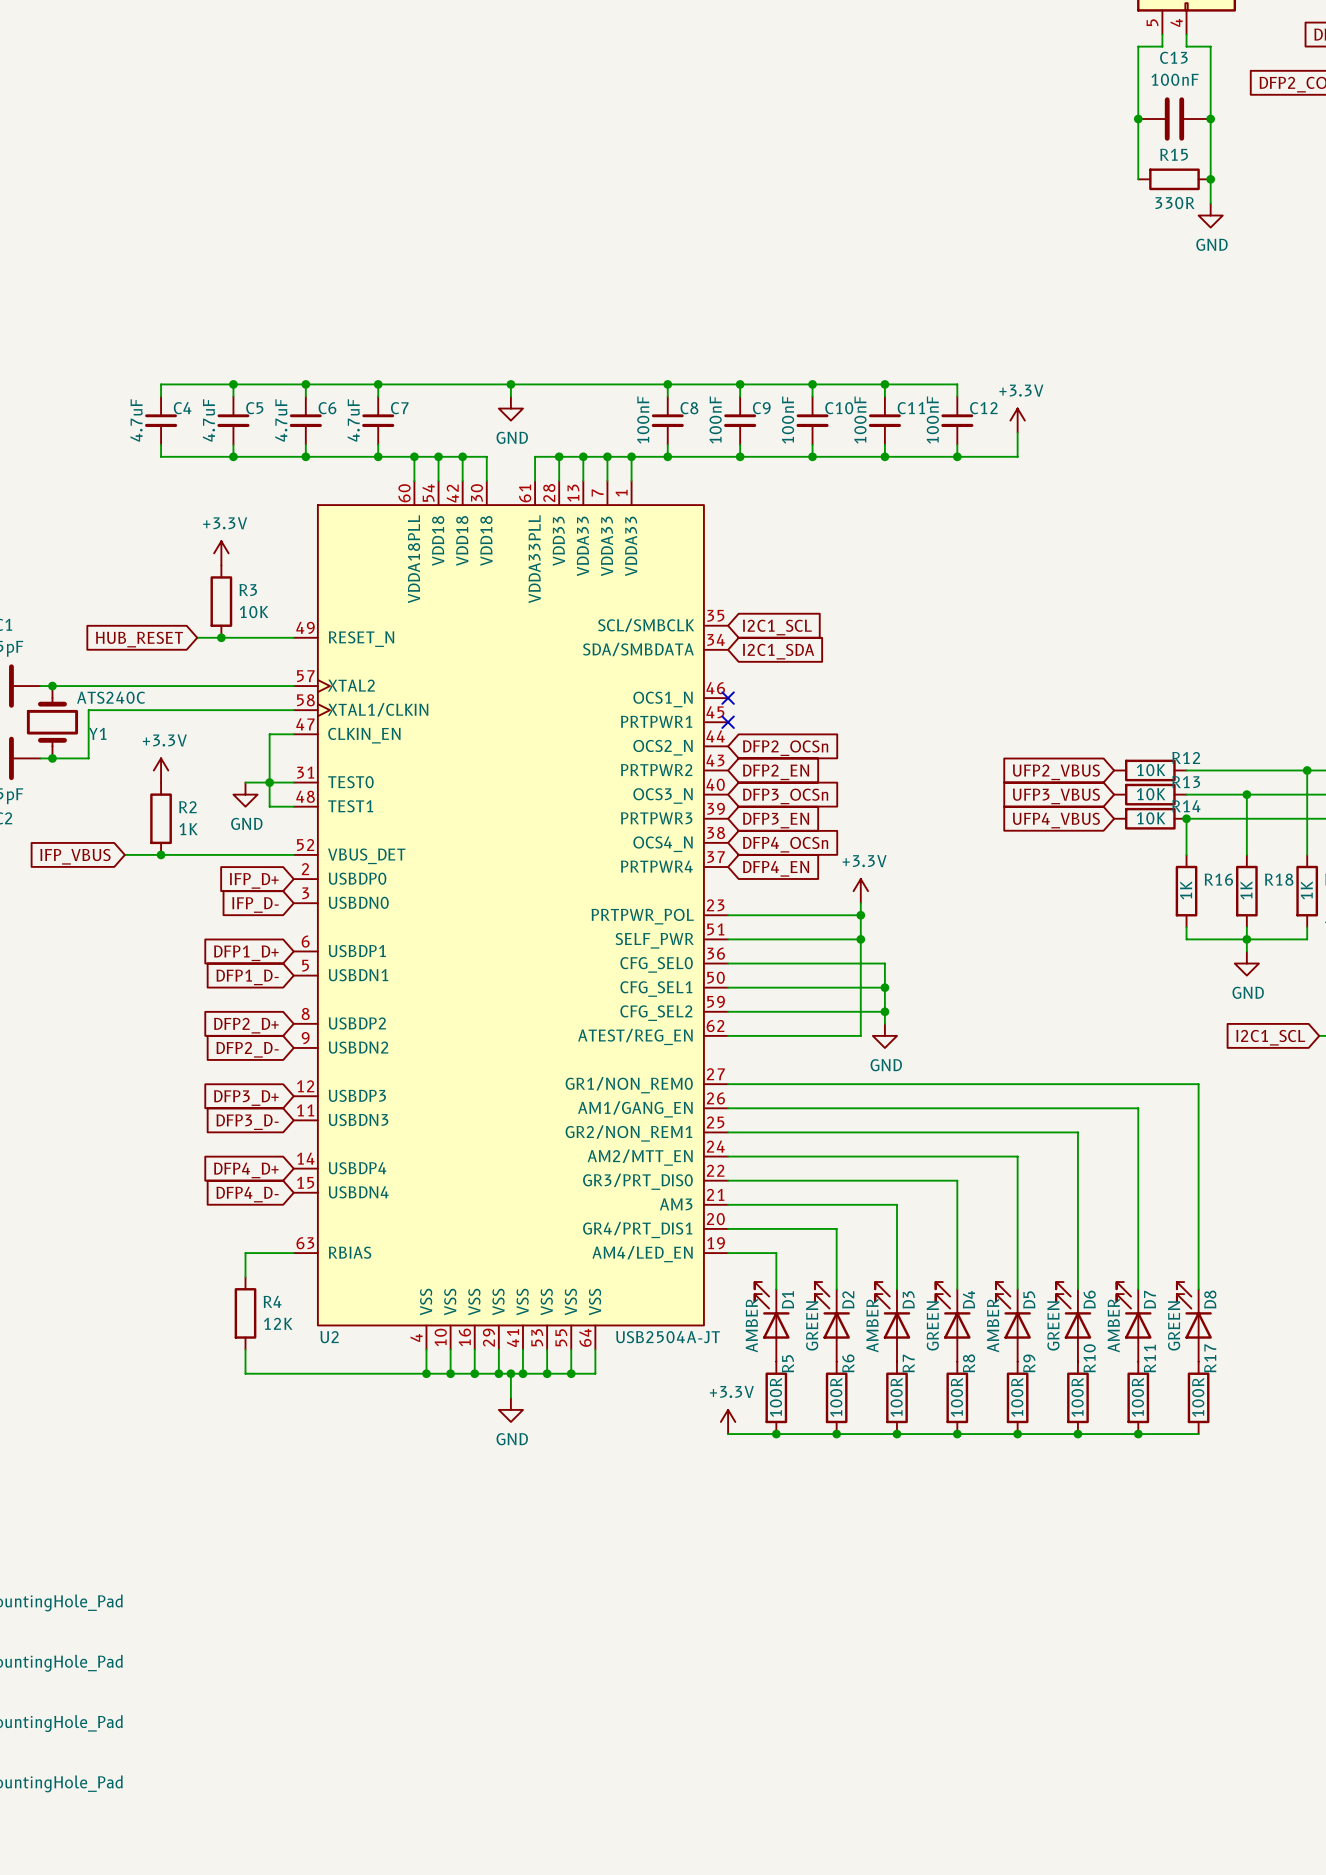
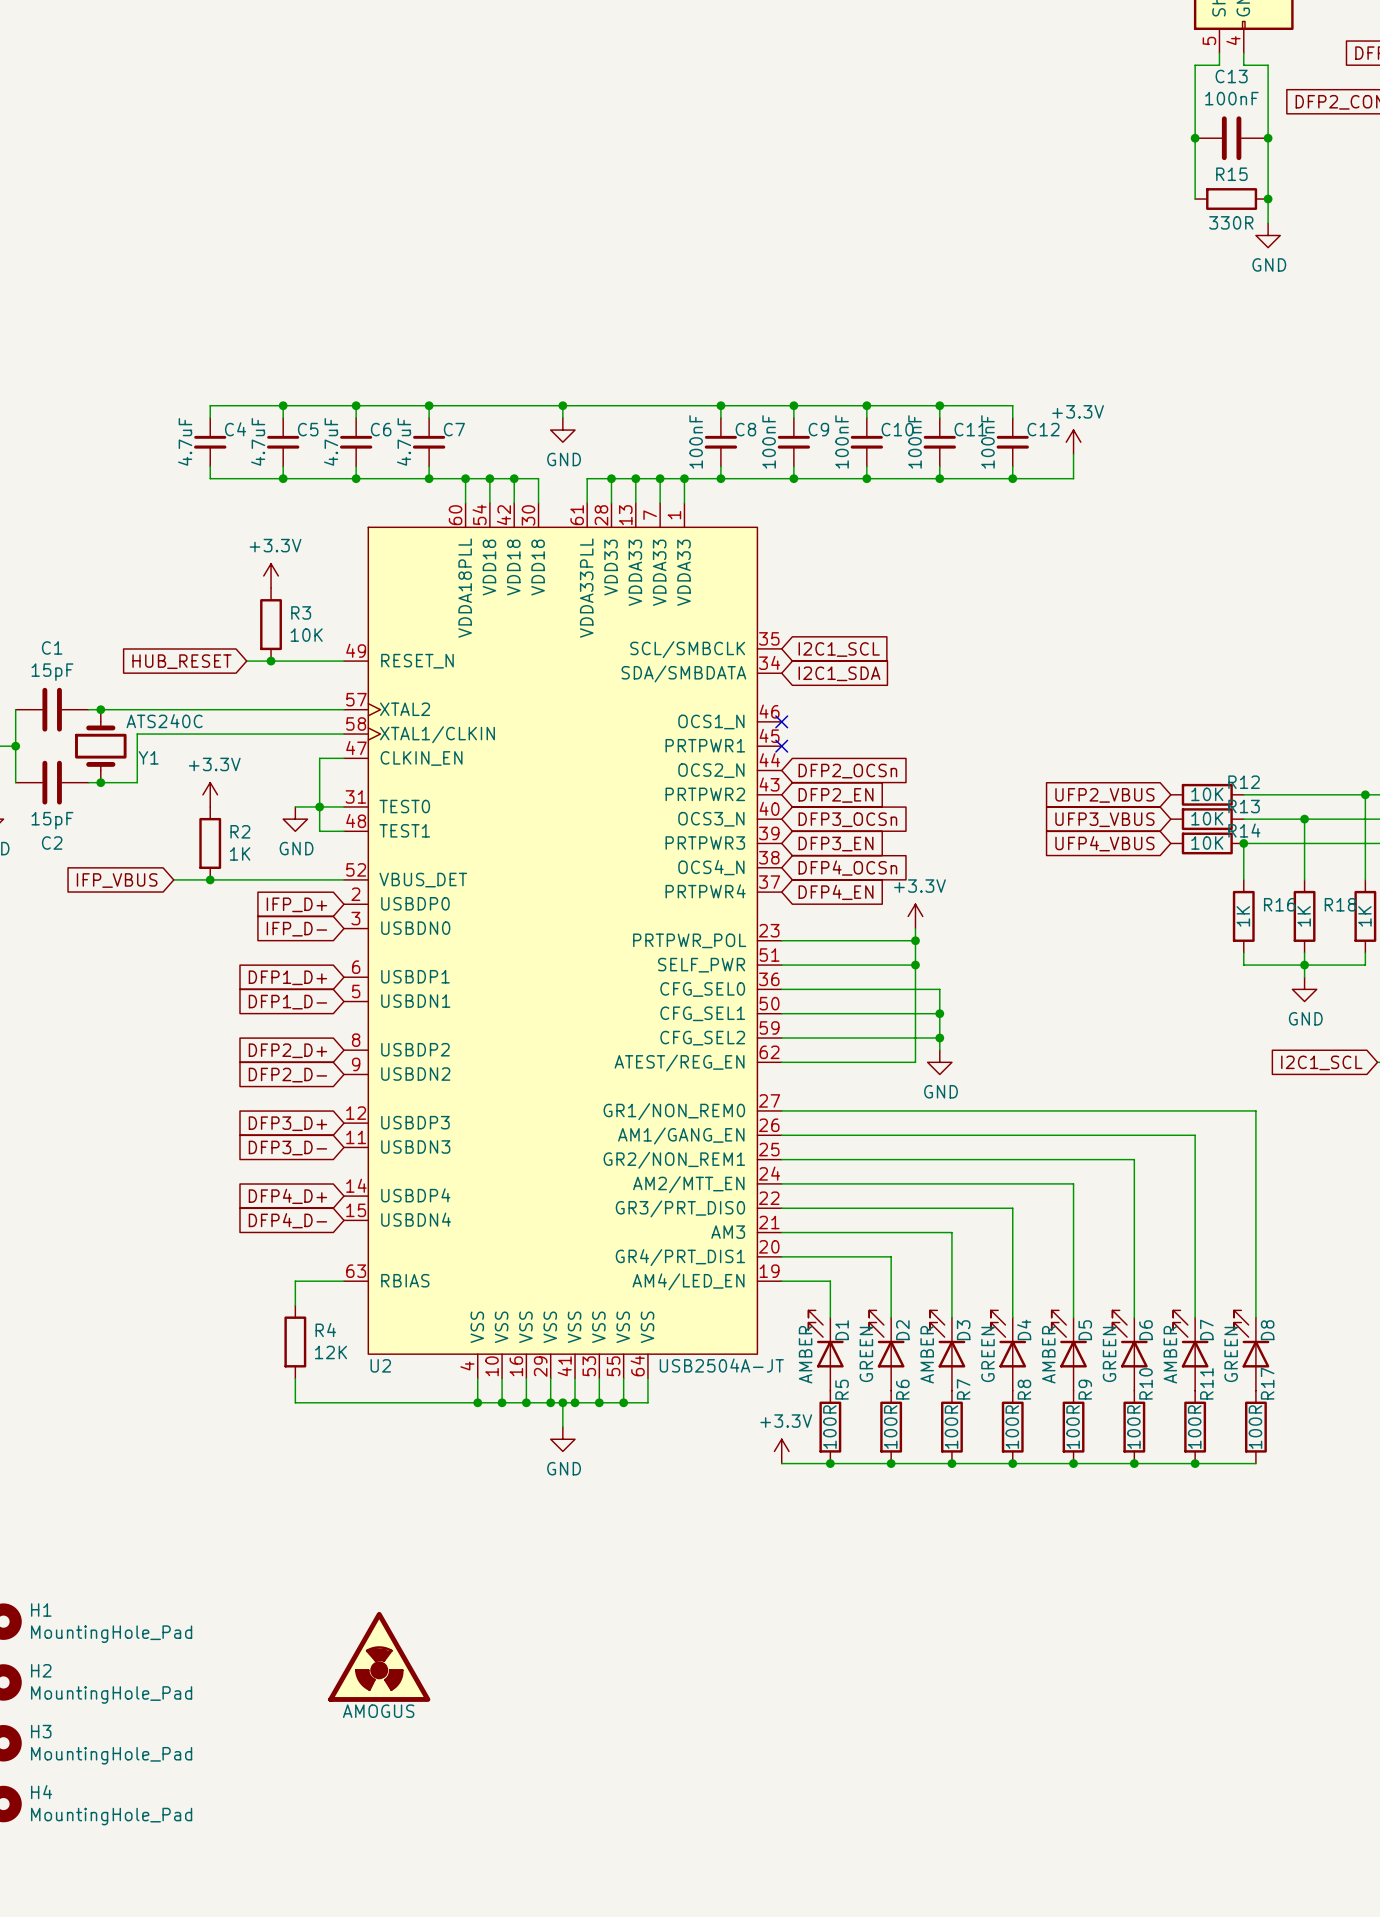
part: none -> AMOGUS (379, 1656)

